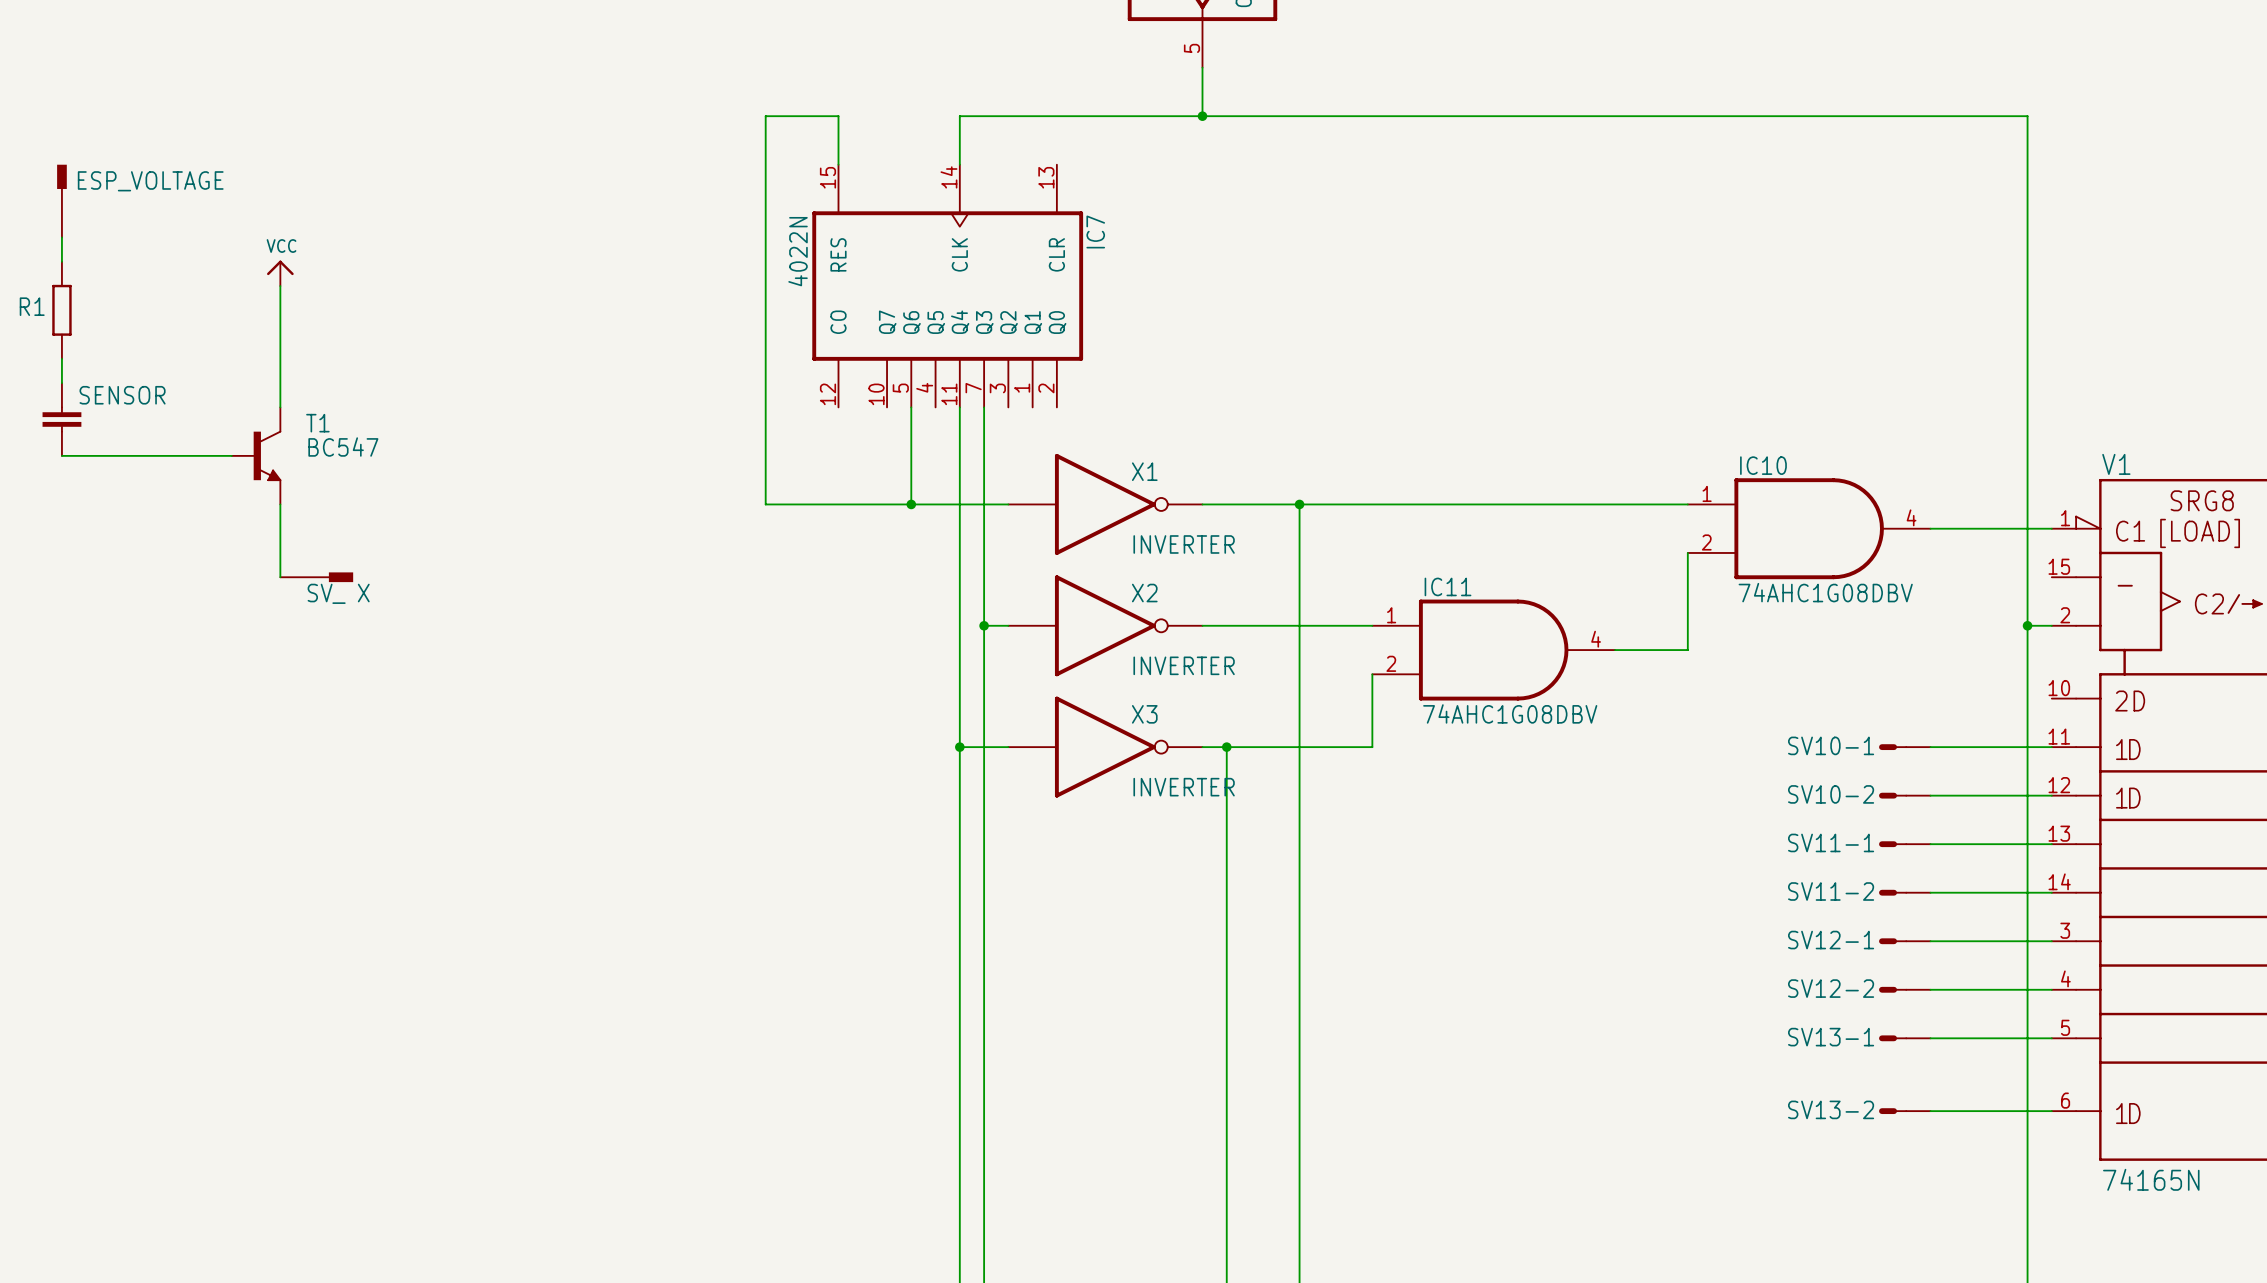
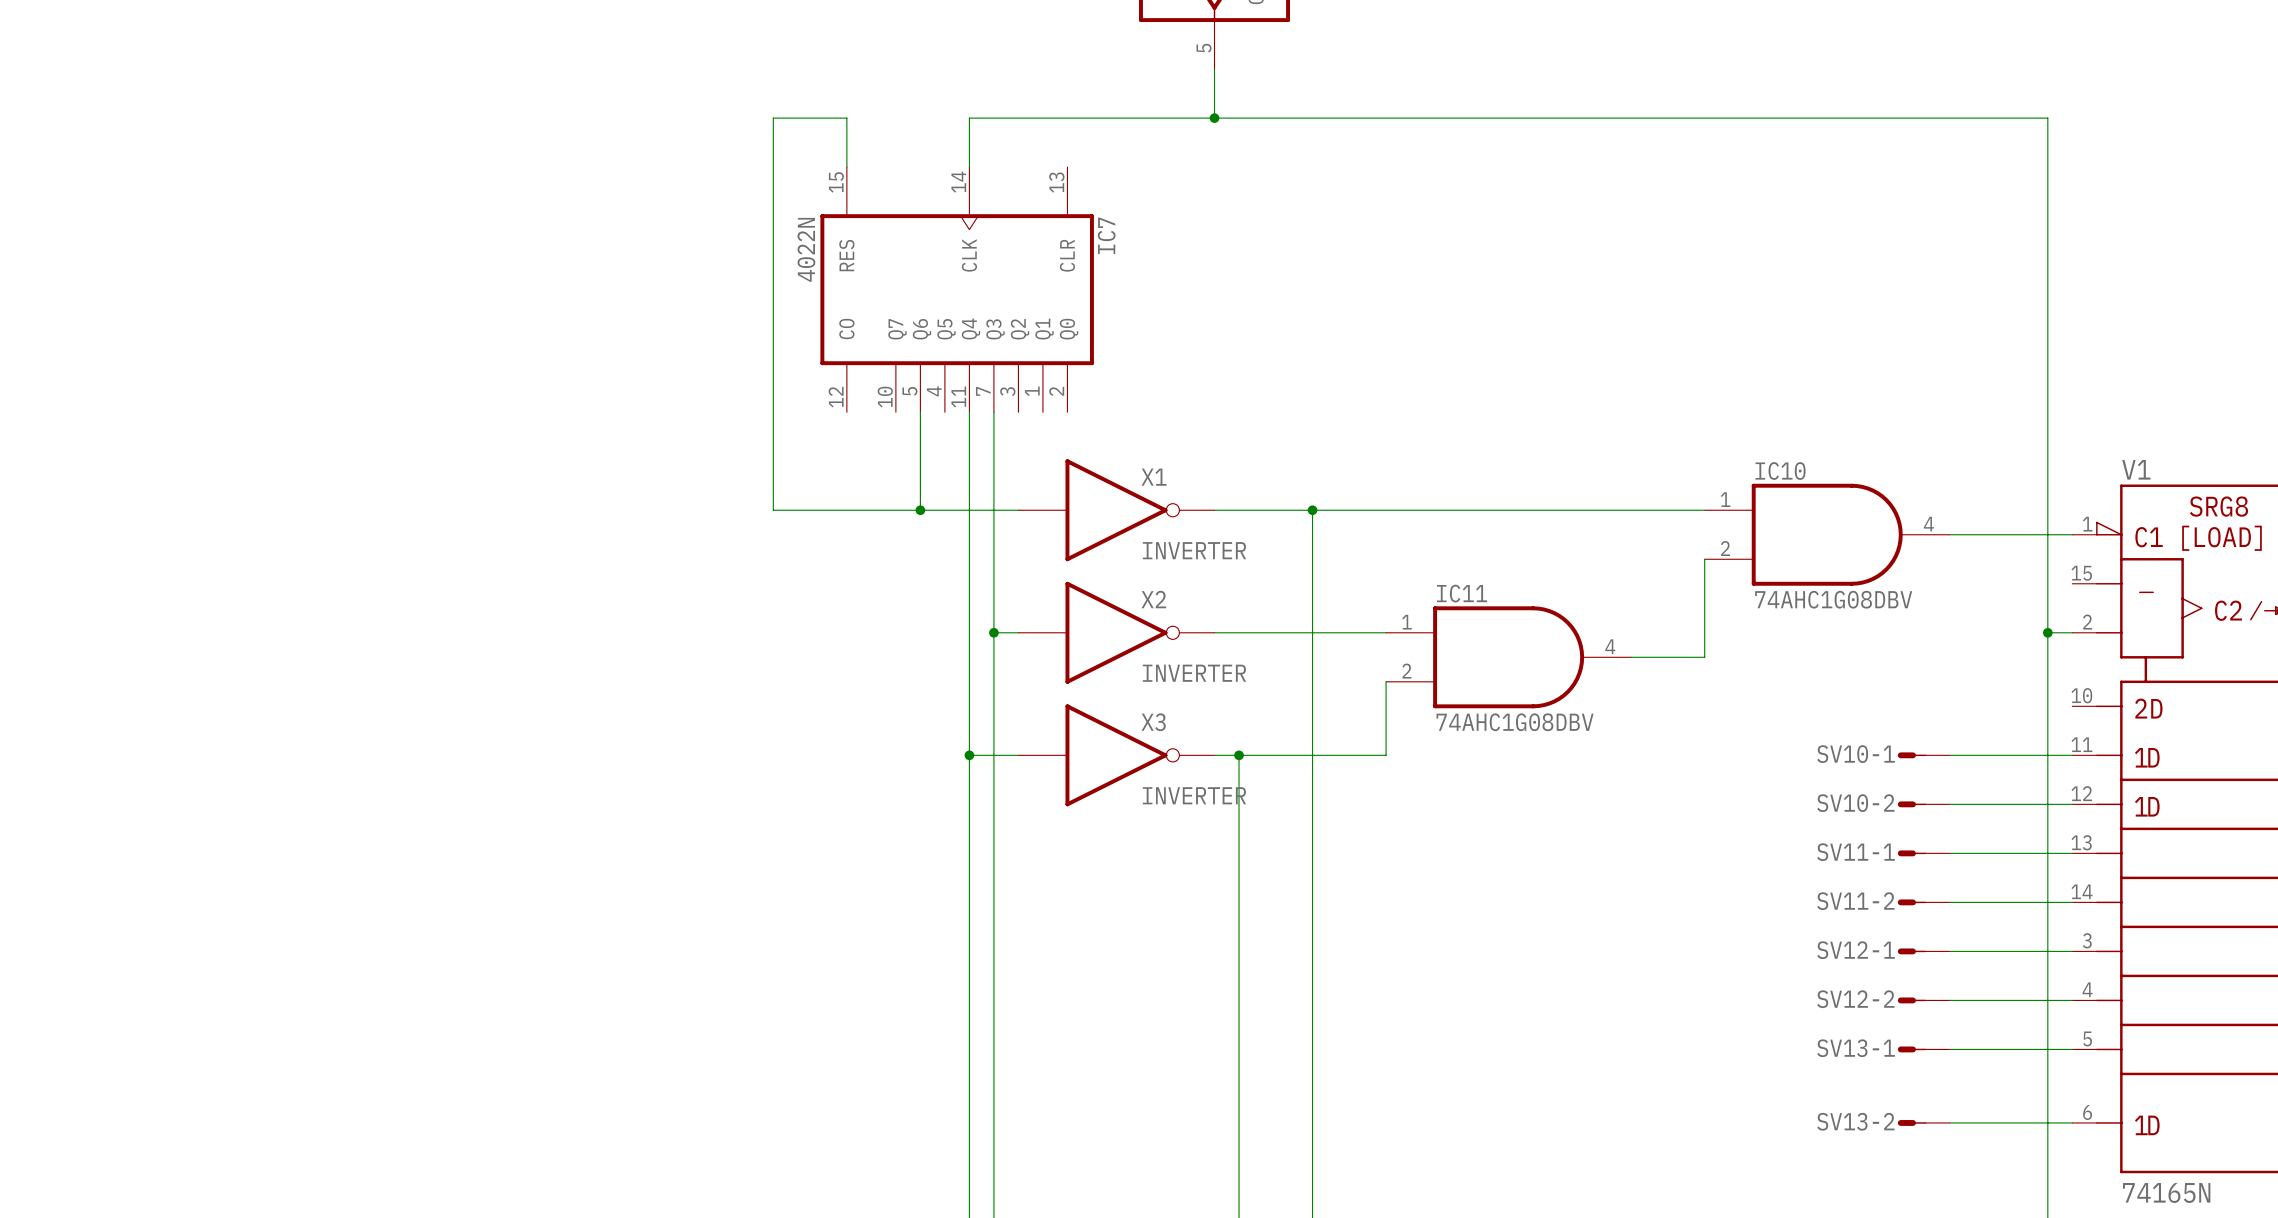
ESP_VOLTAGE: (61, 201) -> none
wire: (61, 237) (61, 261) -> none
power symbol: VCC (280, 273) -> none
wire: (280, 286) (280, 407) -> none
R1: (61, 310) -> none
wire: (61, 358) (61, 383) -> none
SENSOR: (61, 419) -> none
wire: (61, 455) (231, 455) -> none
T1: BC547 (256, 455) -> none
wire: (280, 504) (280, 577) -> none
part: SV_ X (316, 577) -> none

